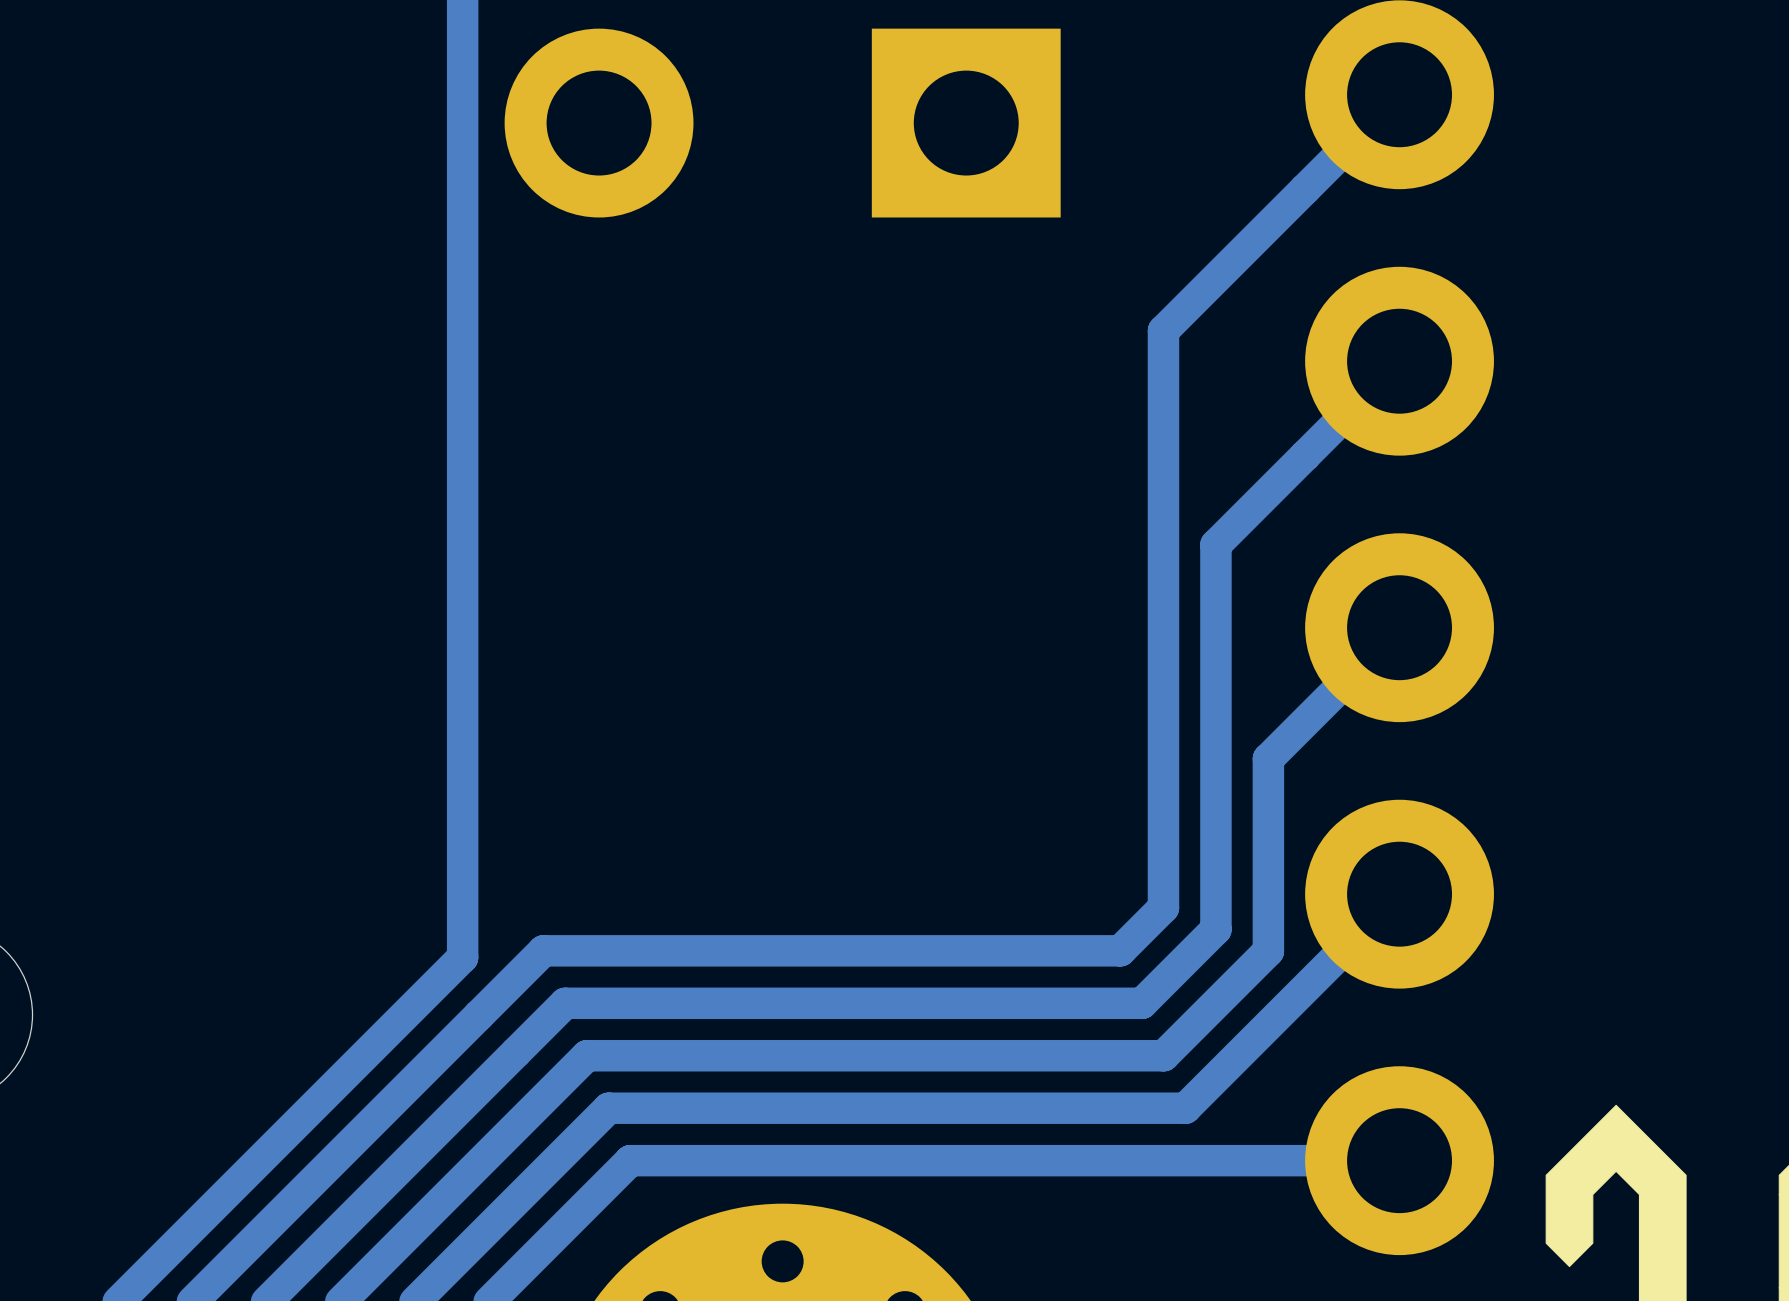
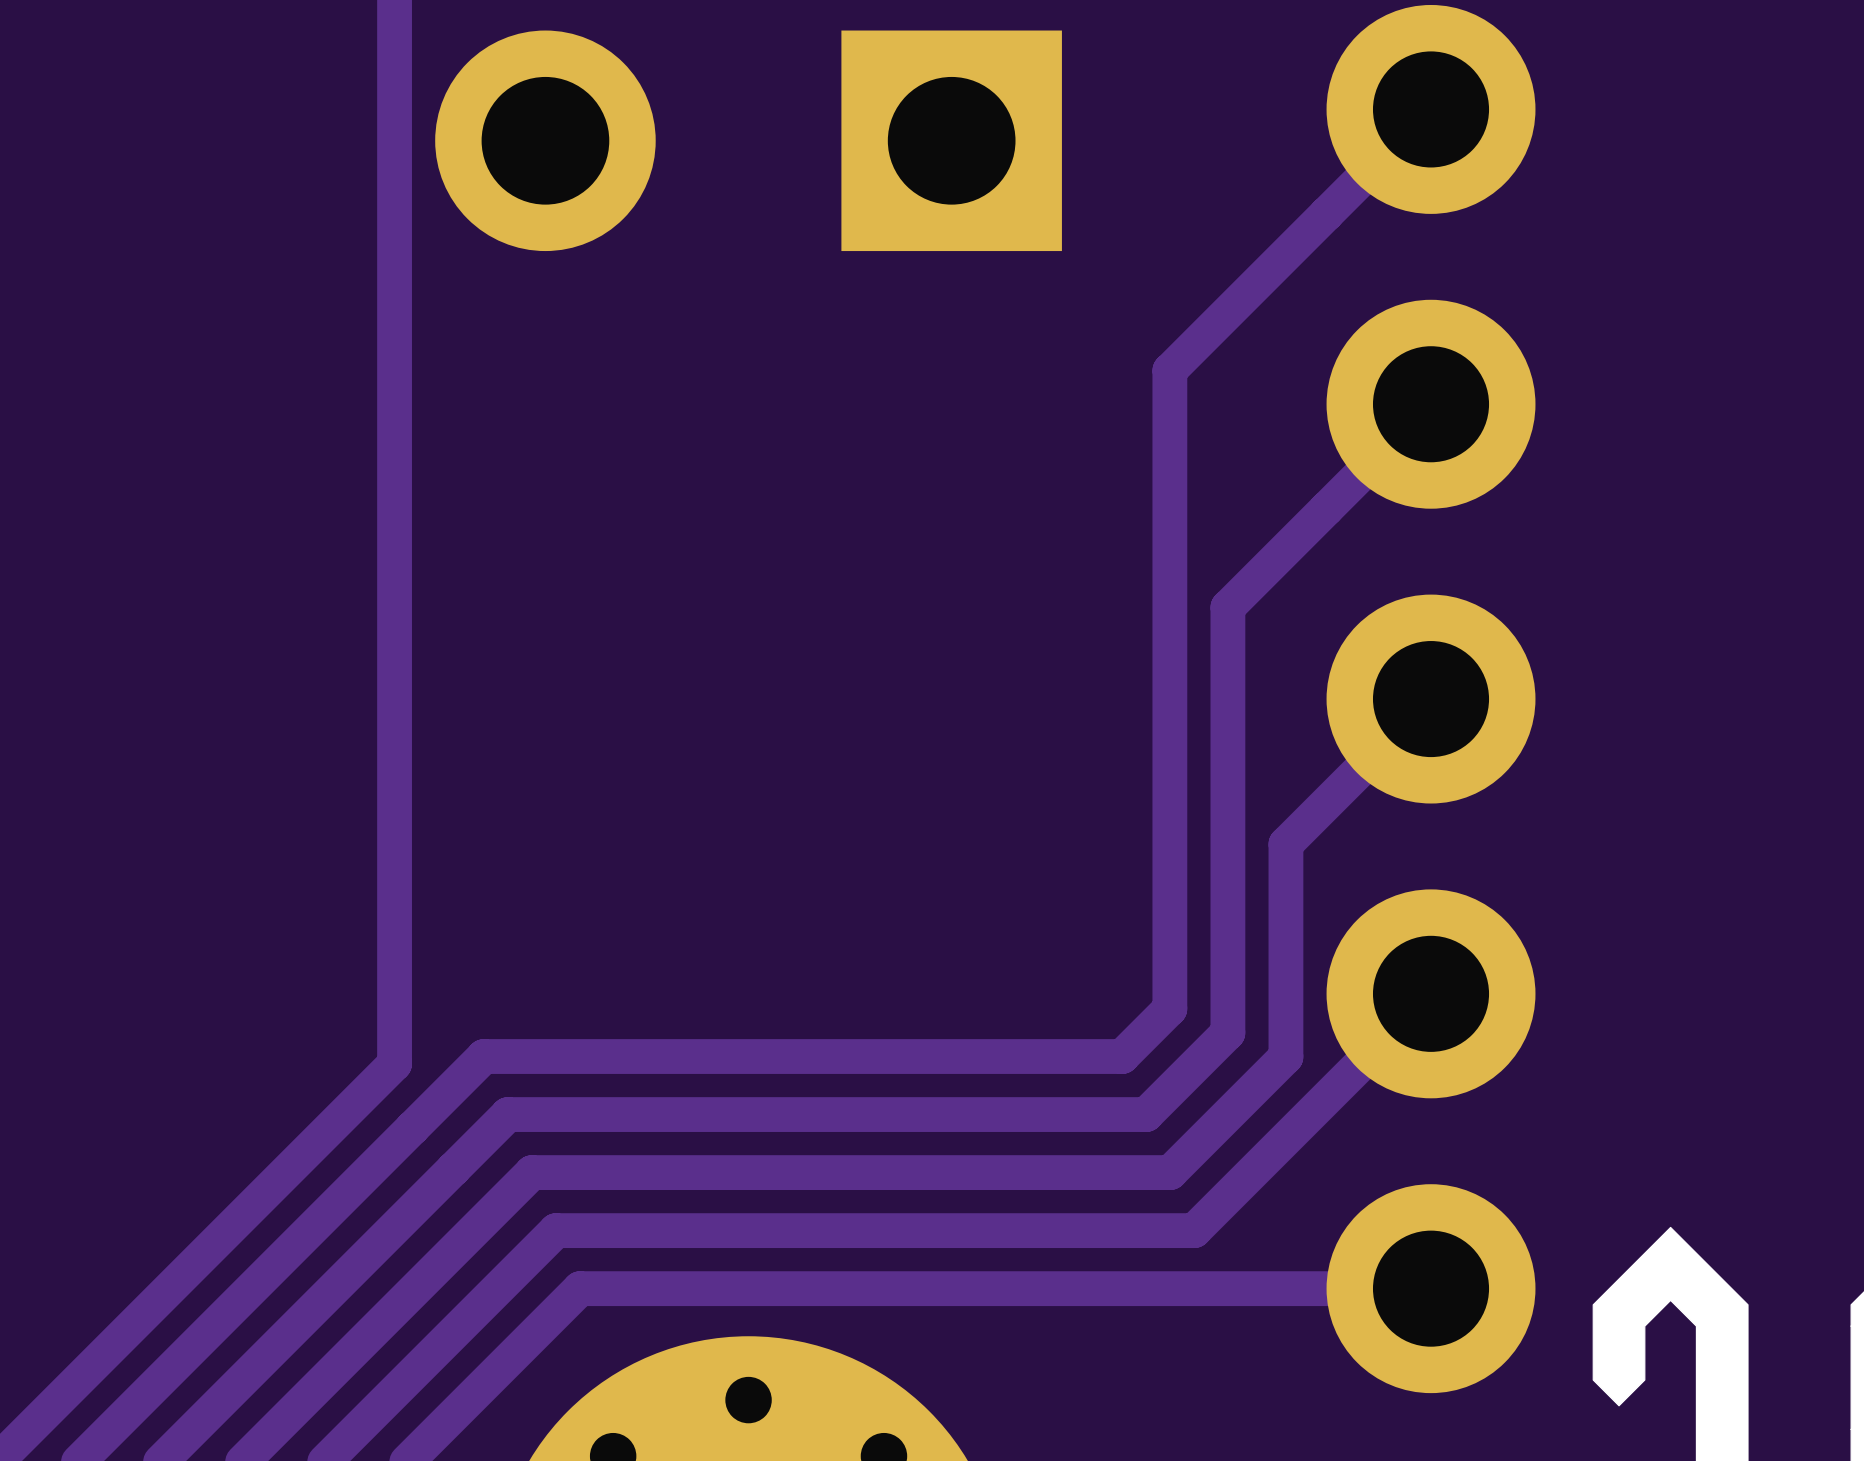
part footprint: [504, 28, 1061, 218] -> [435, 30, 1062, 252]

